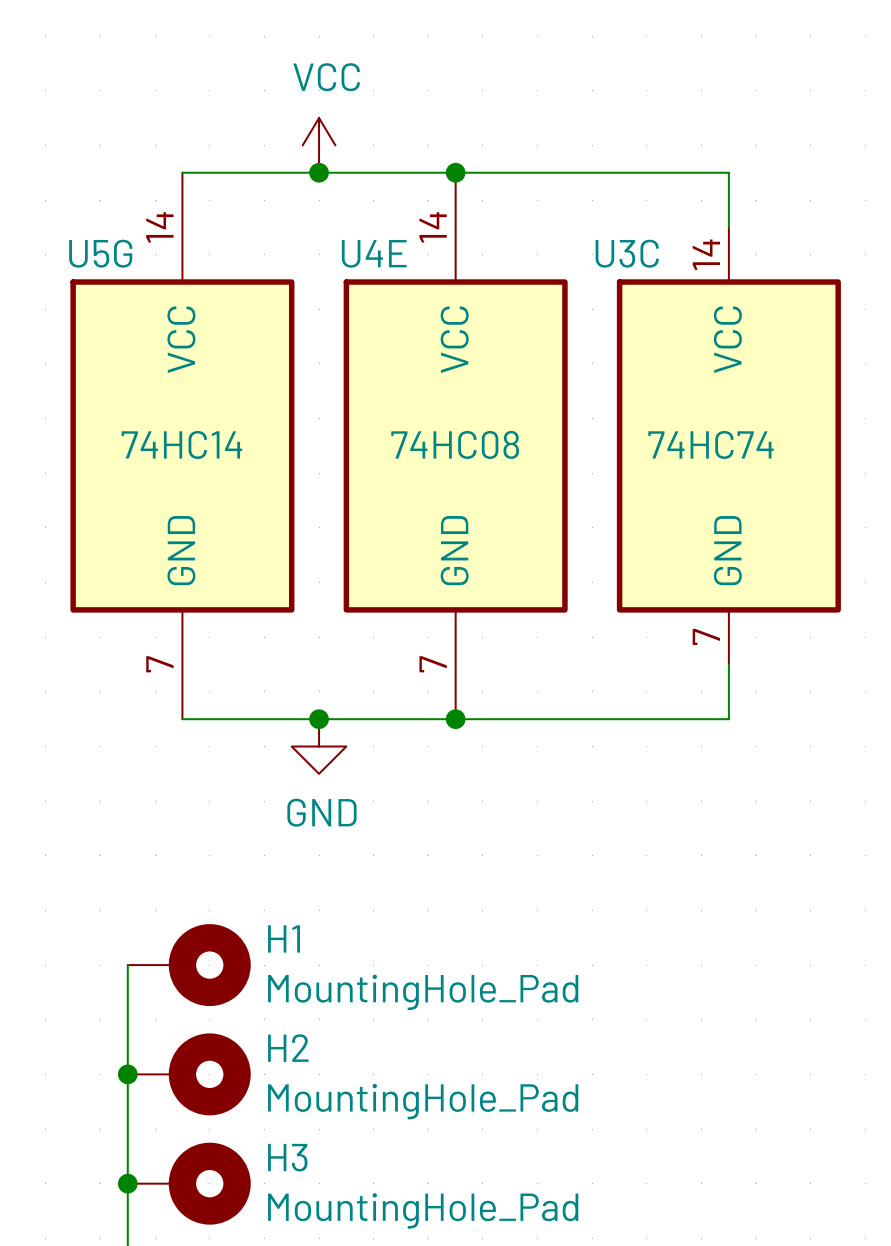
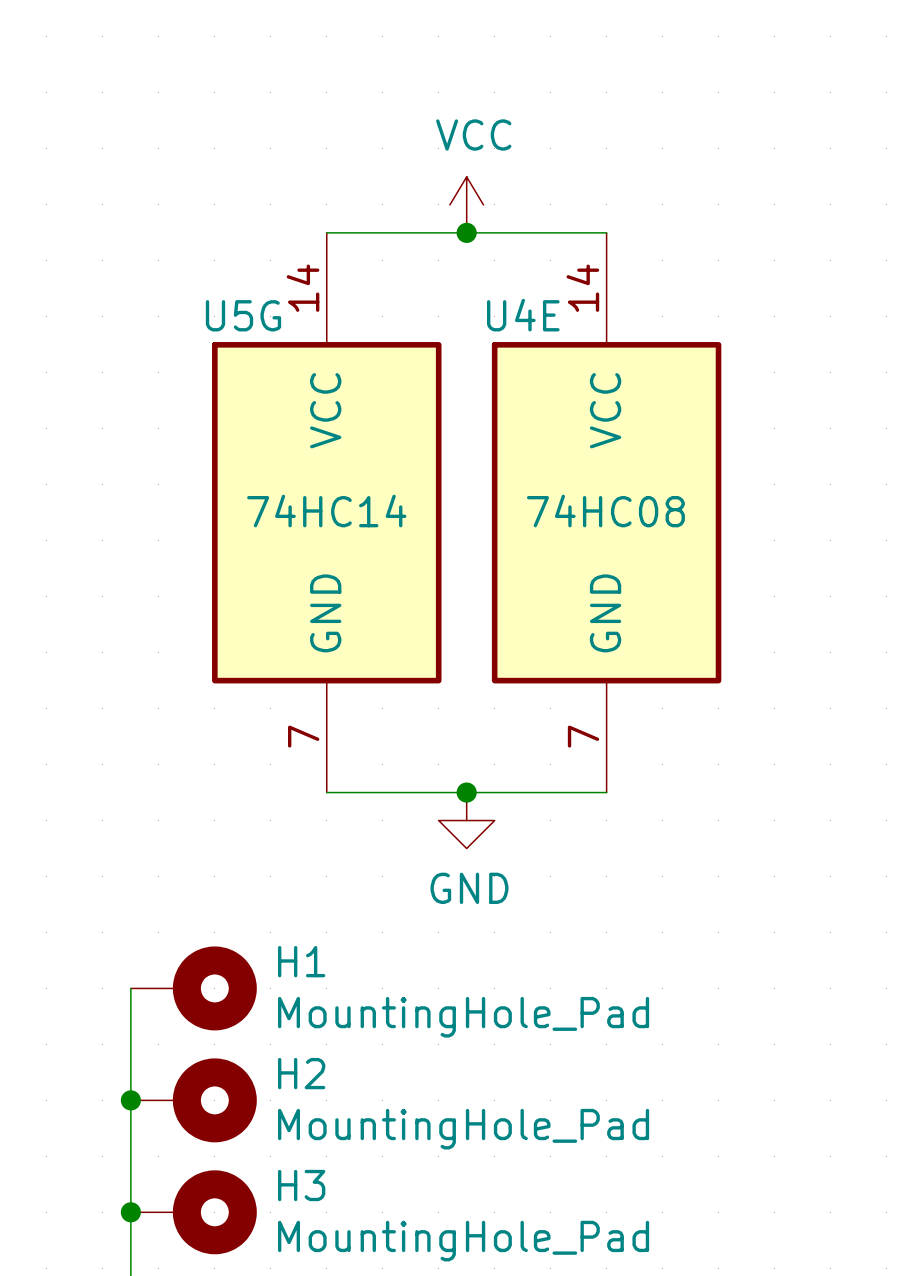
power symbol position: VCC (319, 145) -> VCC (466, 204)
wire: (182, 172) (728, 172) (728, 227) -> none
junction: (319, 172) -> none
junction position: (455, 172) -> (466, 232)
wire: none -> (326, 232) (606, 232)
U5G position: (182, 445) -> (326, 512)
U4E position: (455, 445) -> (606, 512)
U3C: 74HC74 (728, 445) -> none
wire: (728, 664) (728, 719) (182, 719) -> none
junction: (319, 719) -> none
junction position: (455, 719) -> (466, 792)
power symbol position: GND (319, 746) -> GND (466, 820)
wire: none -> (326, 792) (606, 792)

